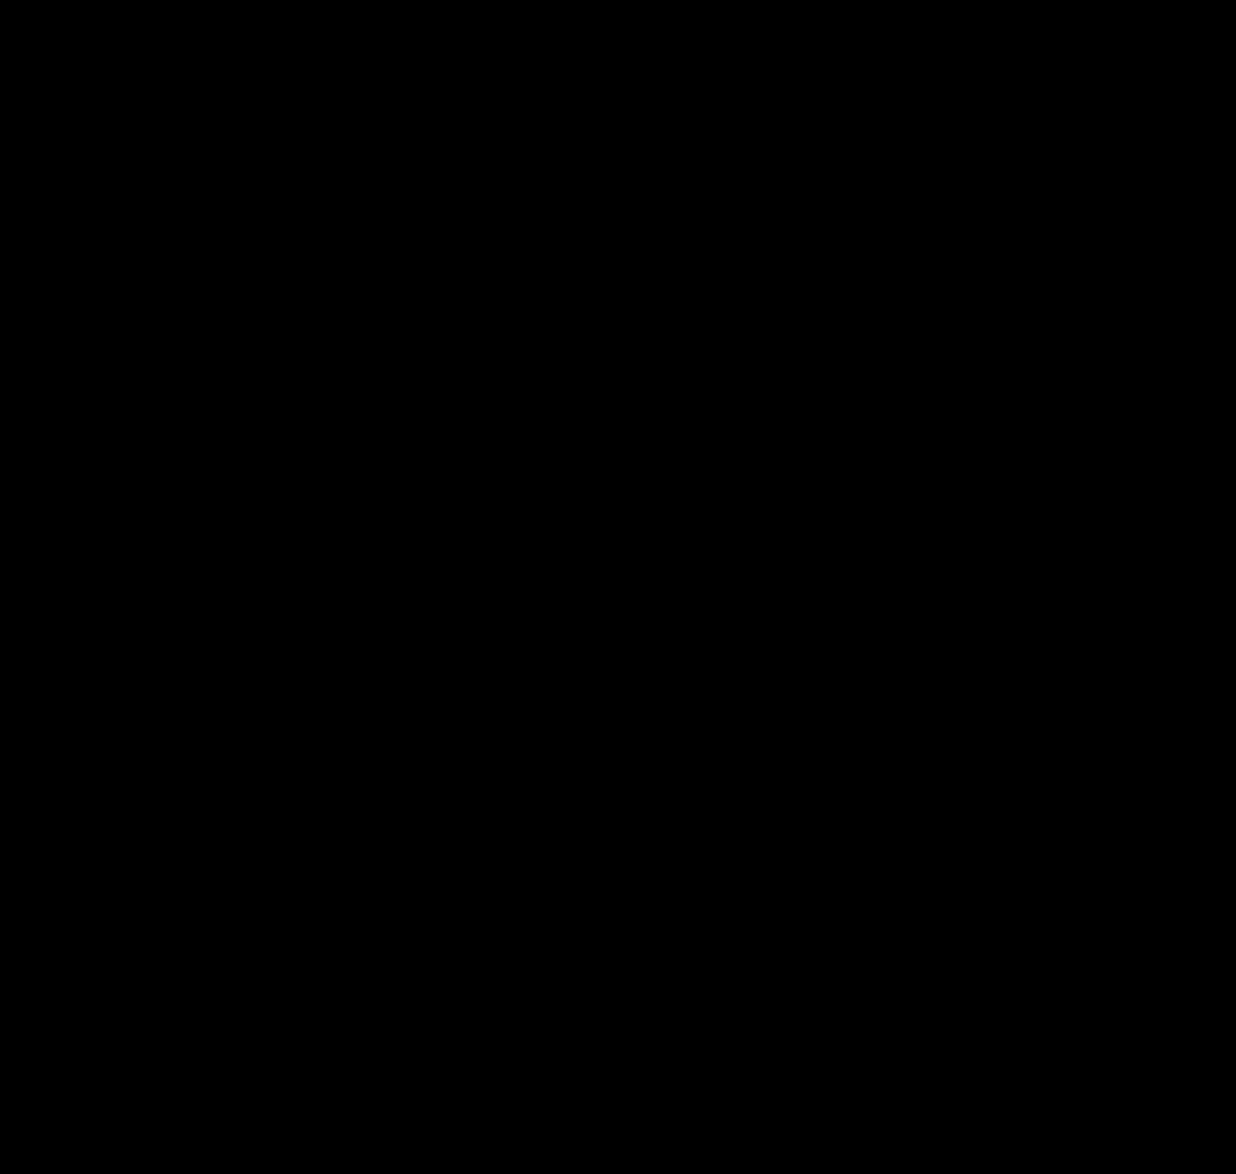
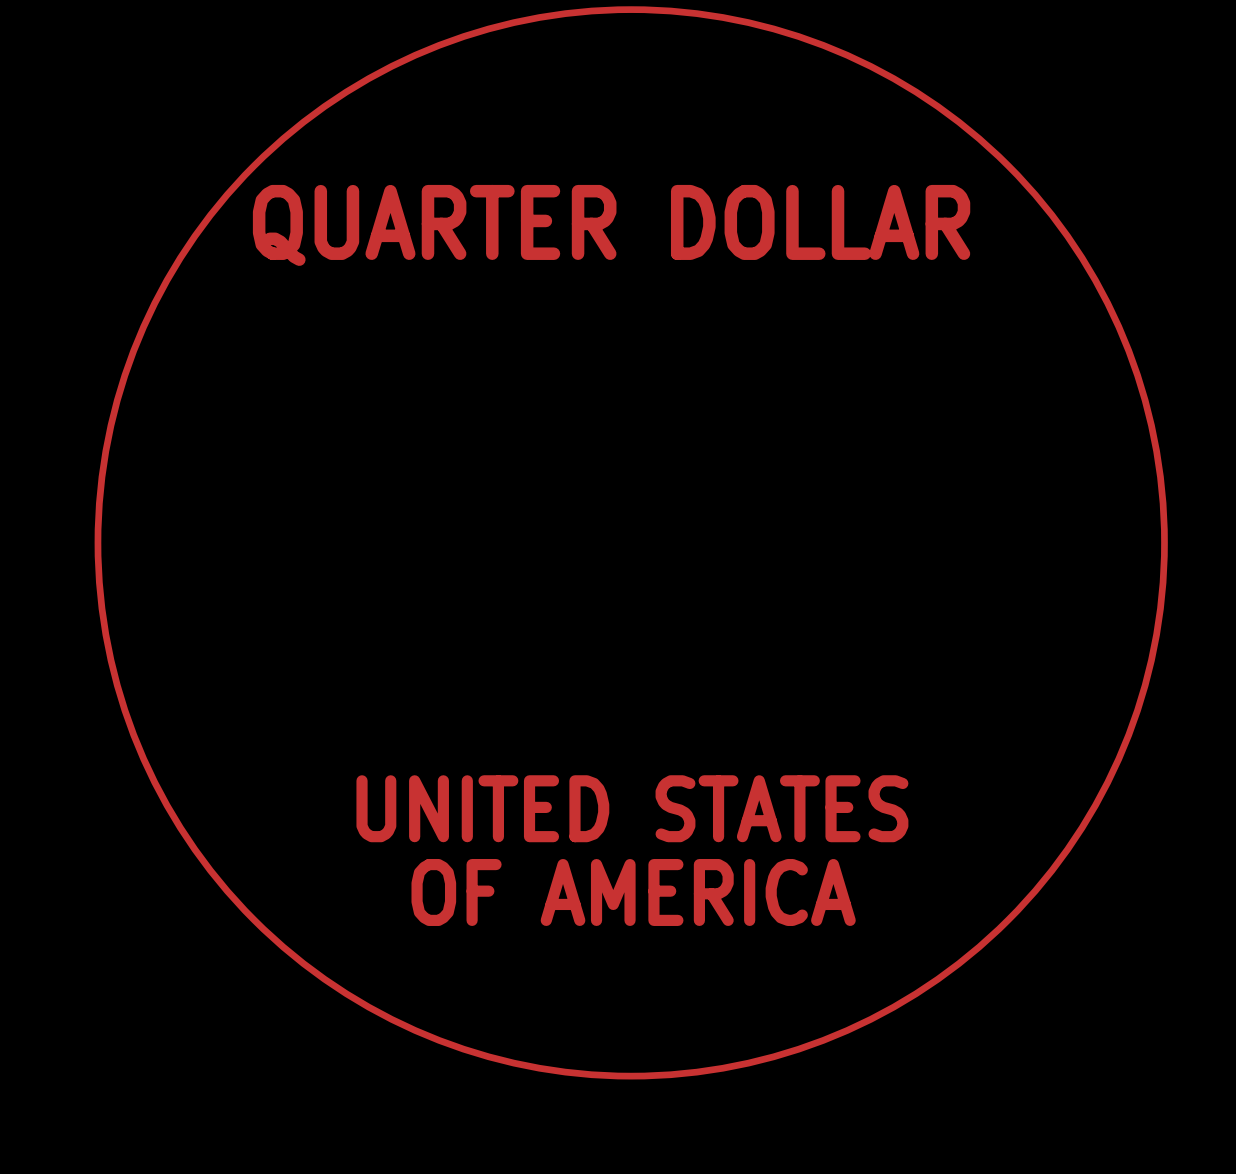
drawing: none -> [94, 6, 1168, 1080]
text: none -> QUARTER DOLLAR (611, 225)
text: none -> UNITED STATES (632, 808)
text: none -> OF AMERICA (633, 892)

